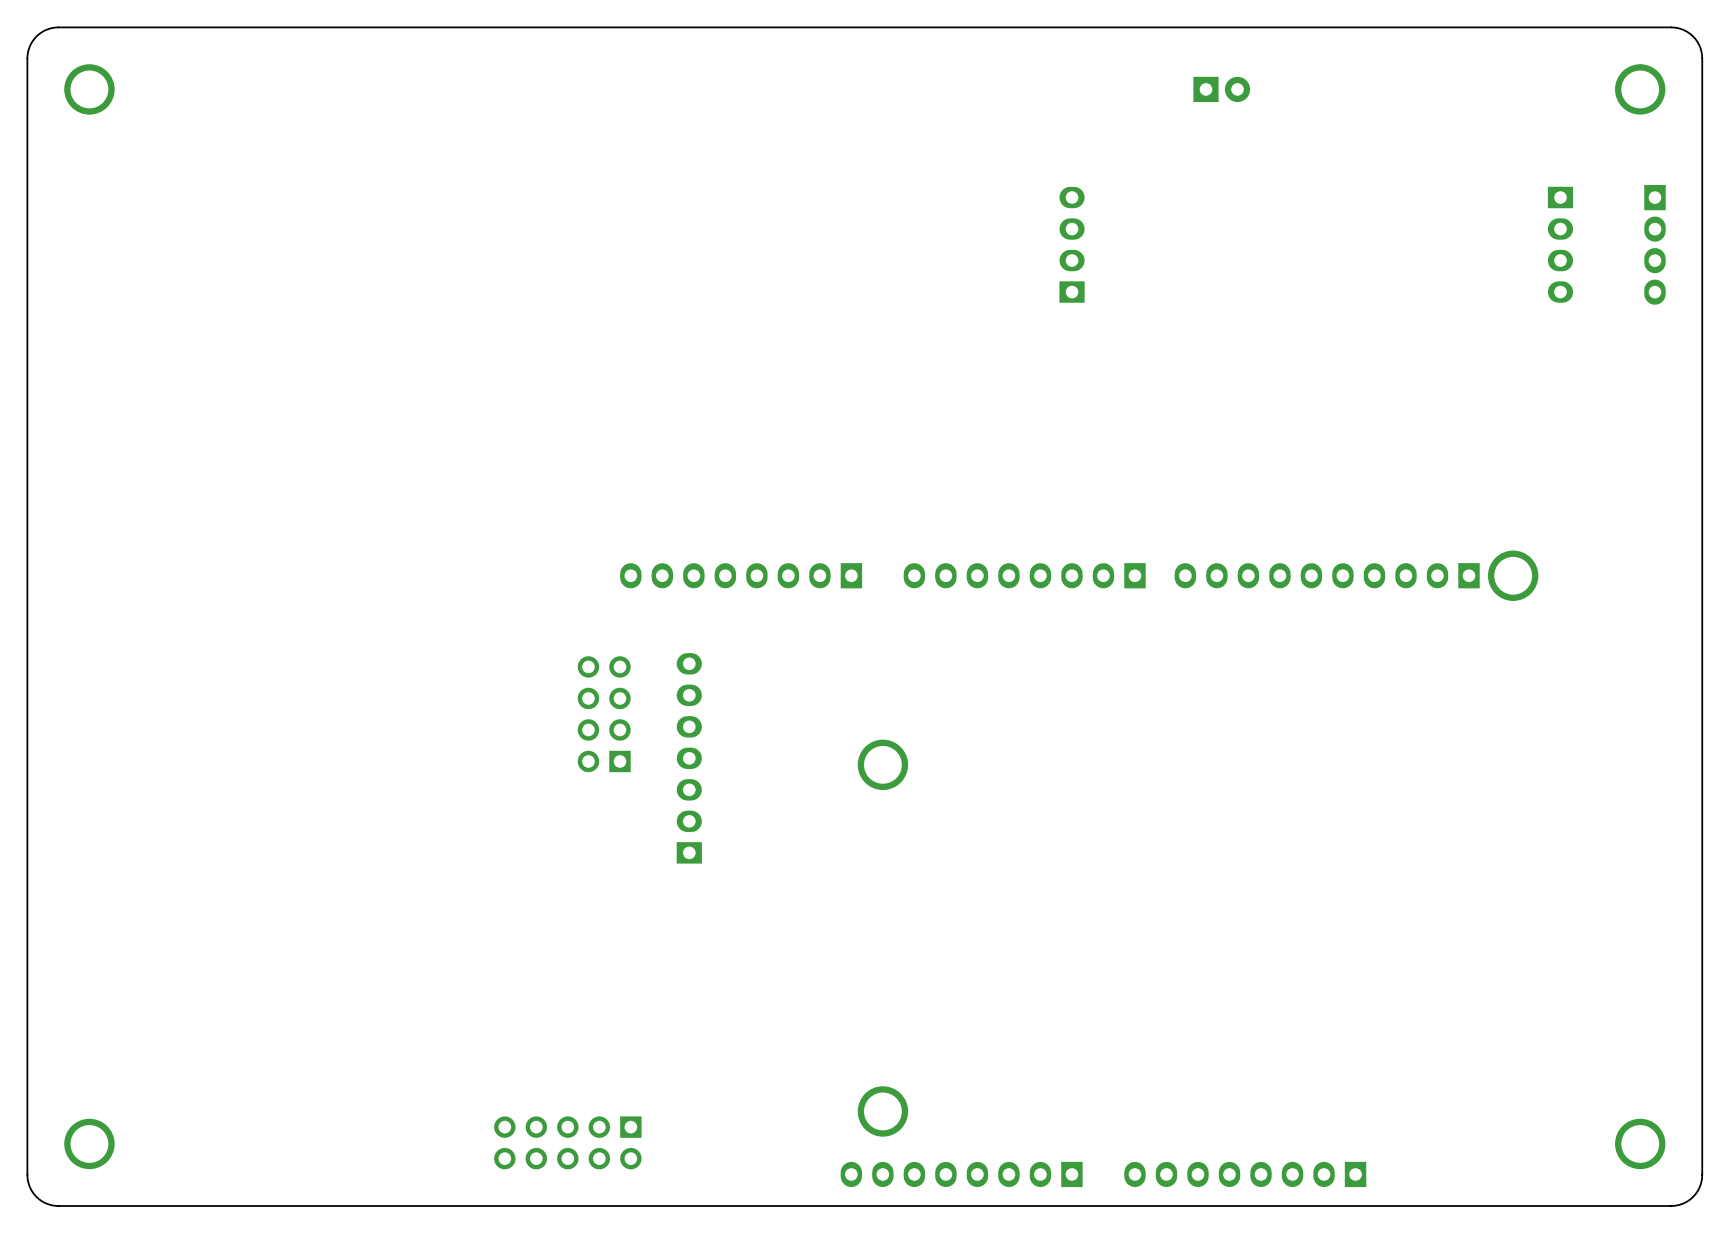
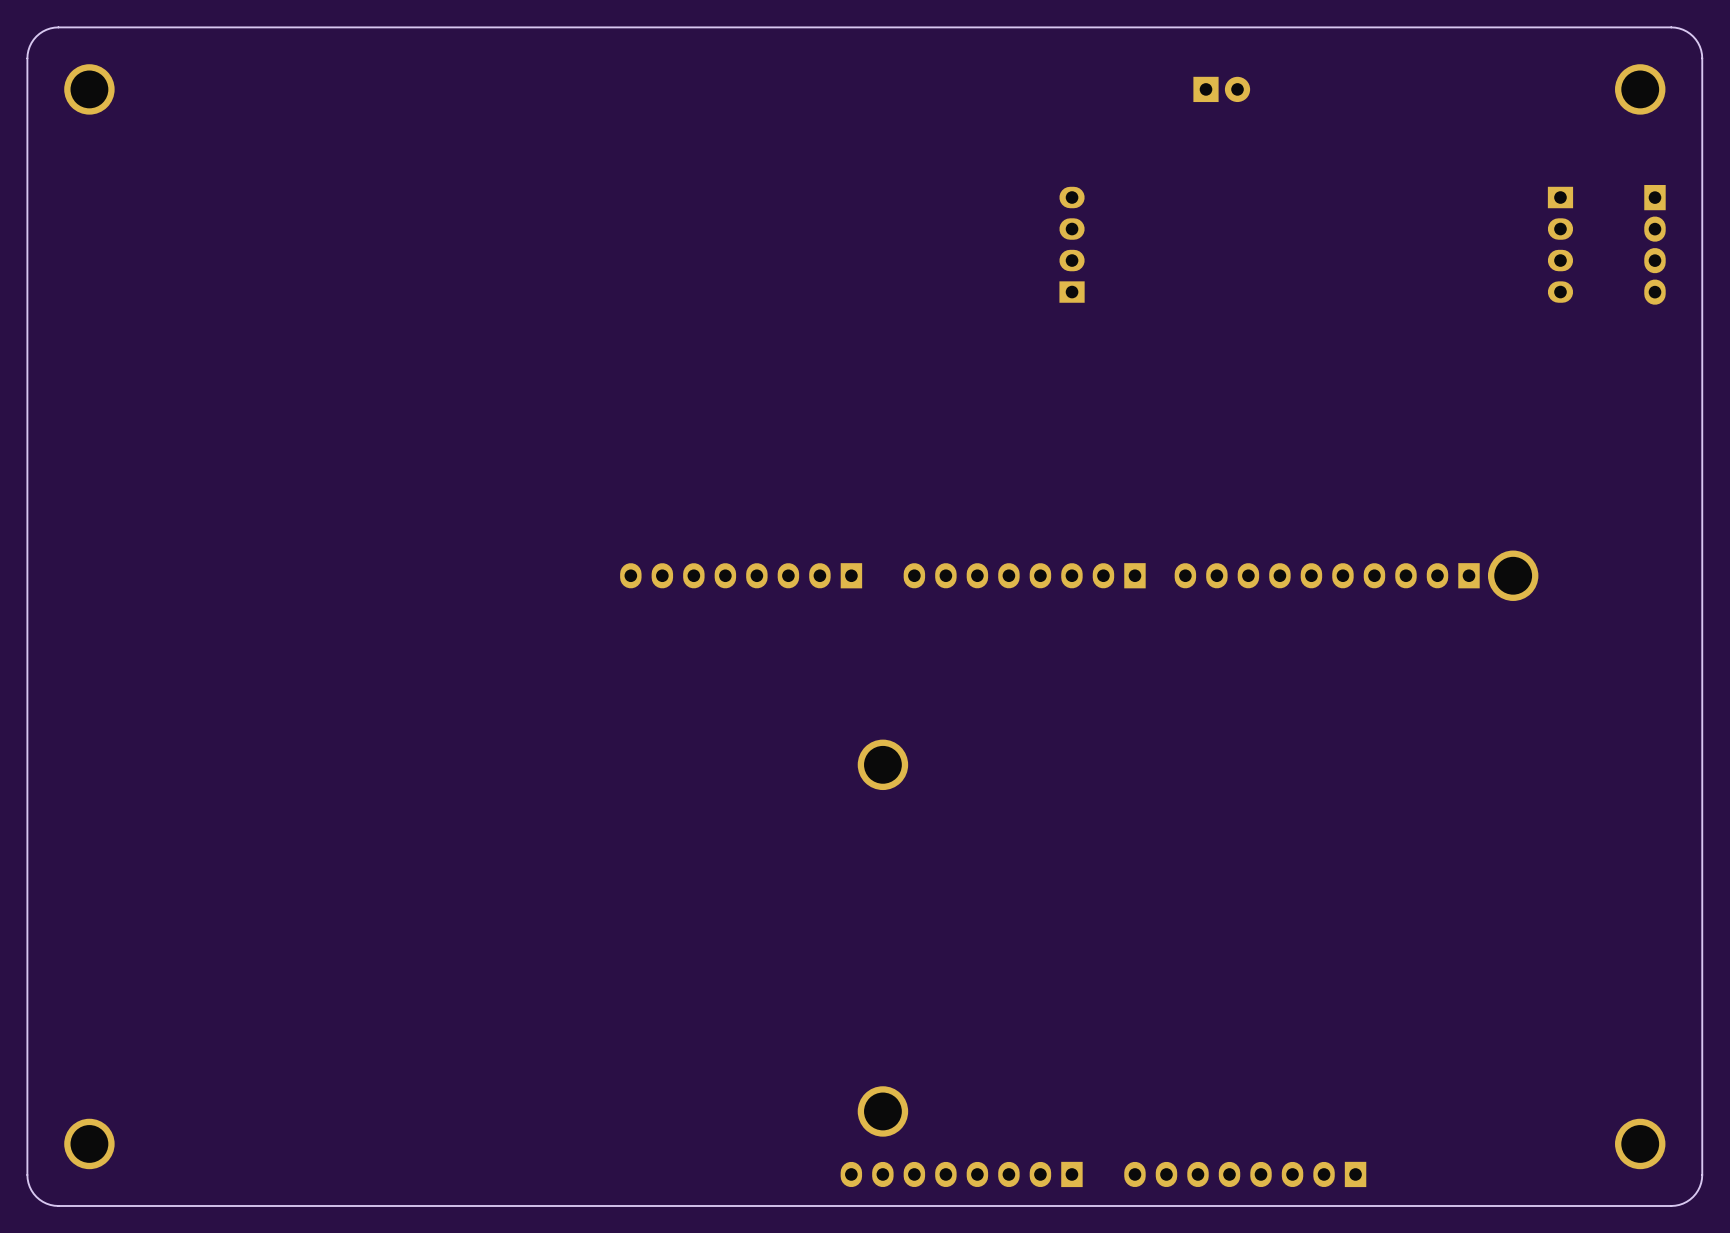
part: (604, 714) -> none
part: (689, 758) -> none
part: (567, 1142) -> none

